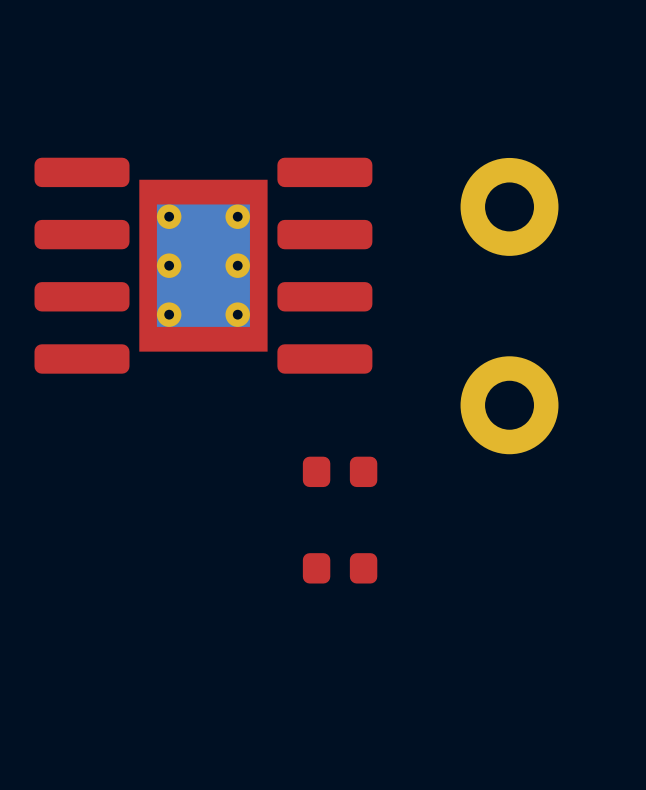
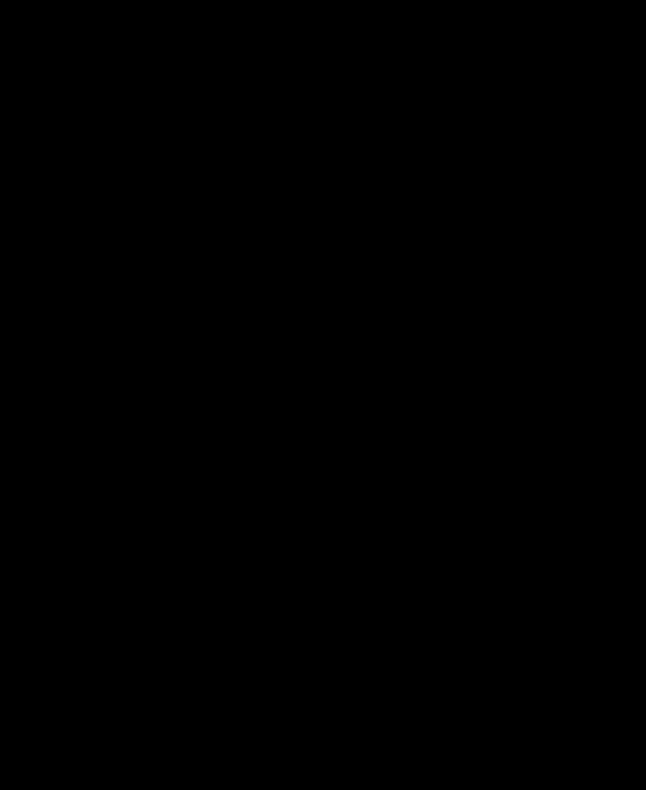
part: (509, 206) -> none
part: (203, 265) -> none
part: (509, 405) -> none
part: (340, 471) -> none
part: (340, 568) -> none

